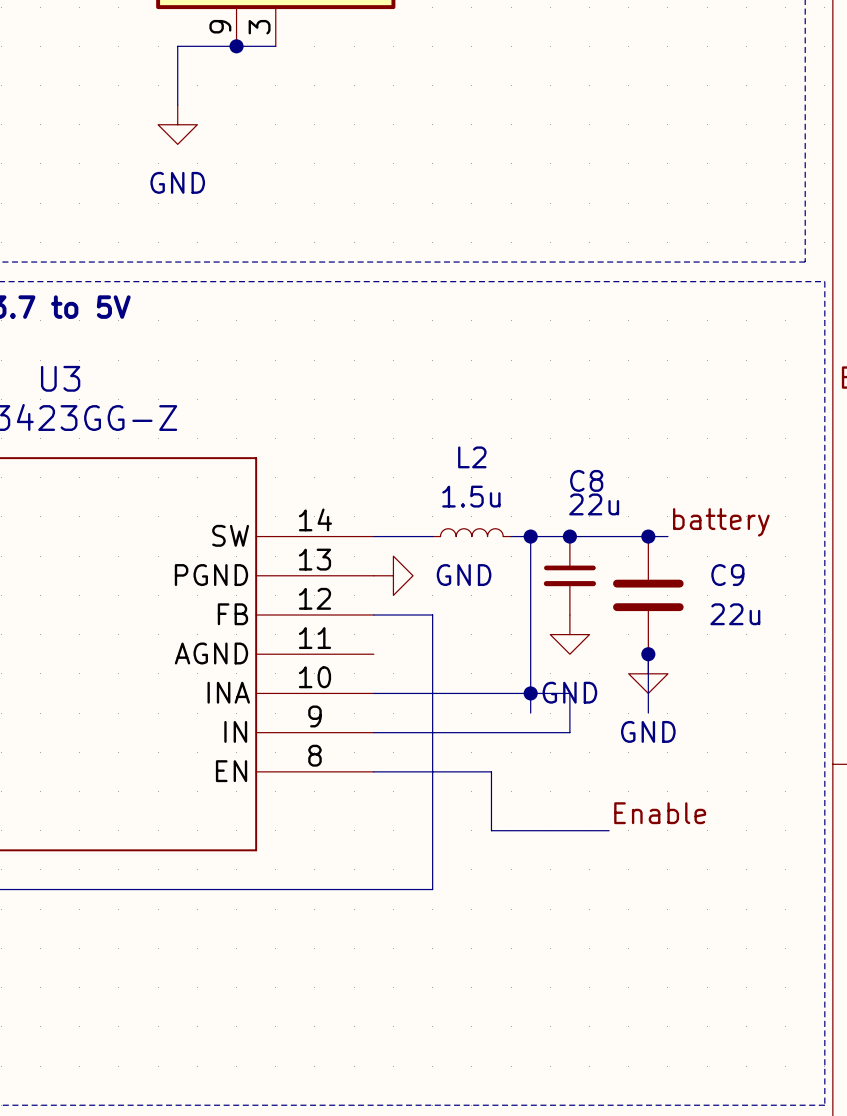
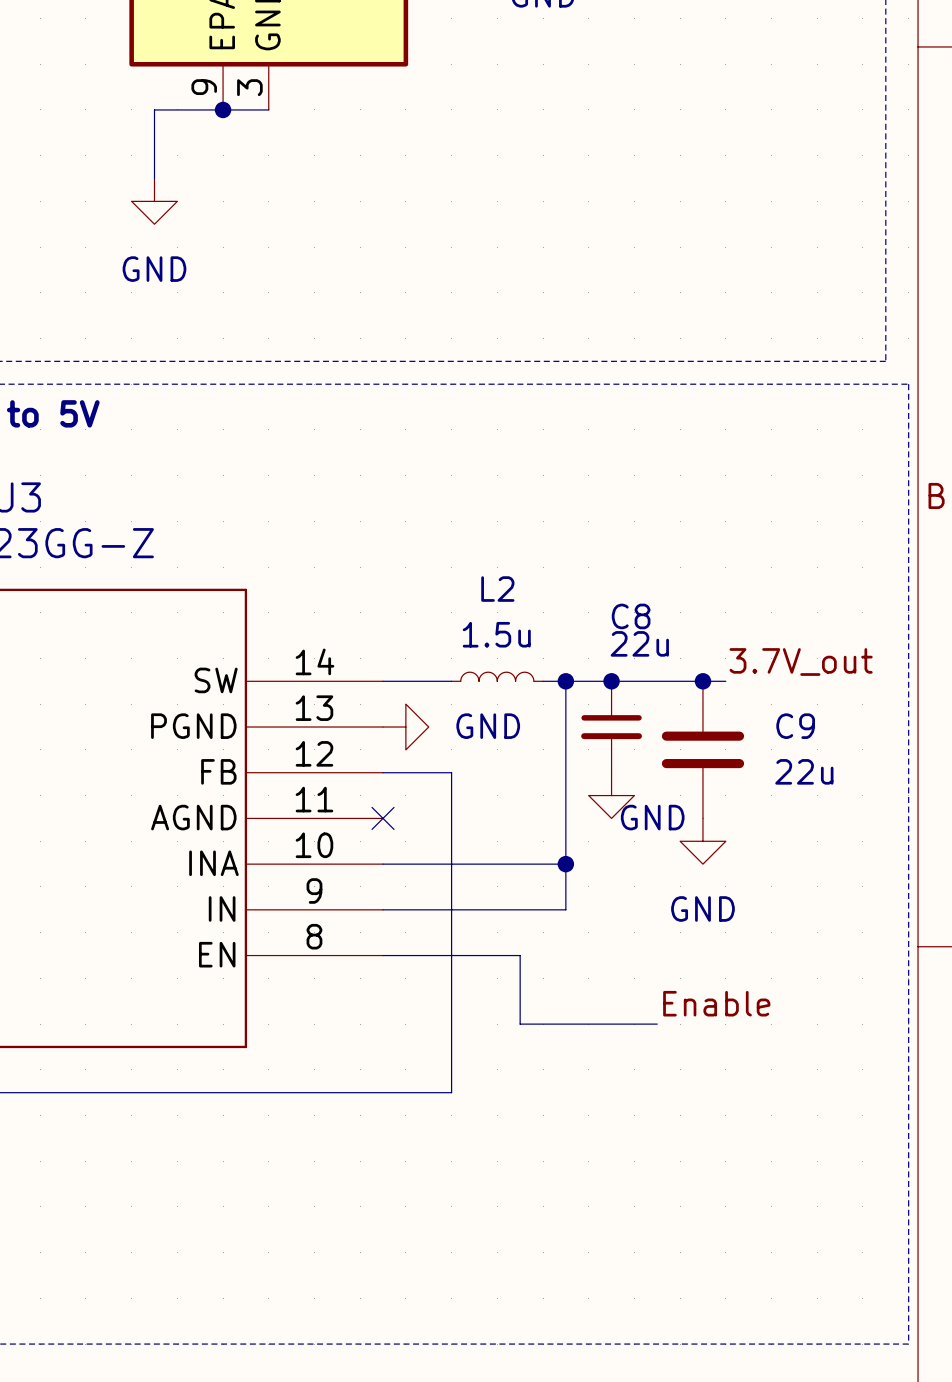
label: battery (721, 522) -> 3.7V_out (801, 662)
no-connect mark: none -> (383, 818)
wire: (648, 654) (648, 713) -> none
junction: (648, 654) -> none
power symbol text position: GND (569, 692) -> GND (652, 817)
wire: (530, 693) (569, 693) (569, 732) (530, 732) -> (565, 886) (565, 909)

